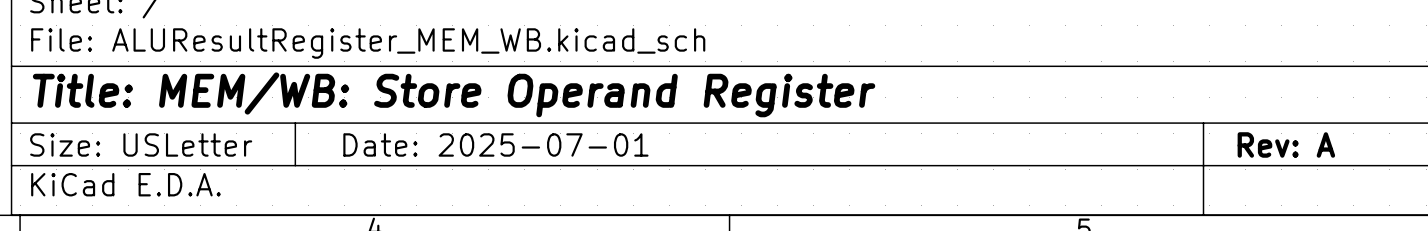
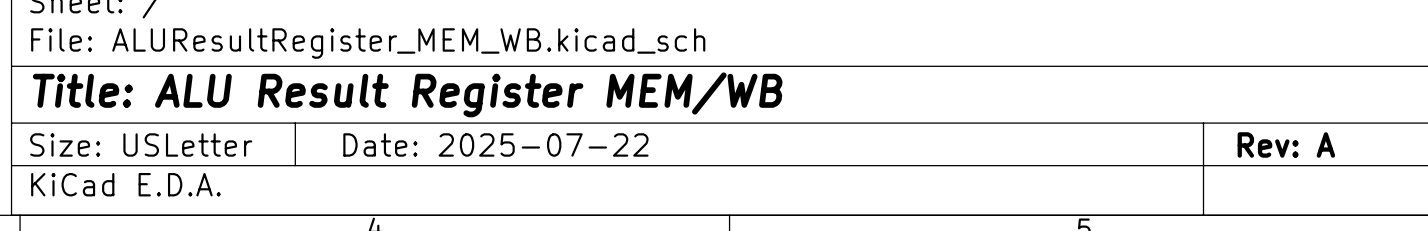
title block: Title: MEM/WB: Store Operand Register (454, 94) -> Title: ALU Result Register MEM/WB (407, 94)
title block: Date: 2025-07-01 (495, 144) -> Date: 2025-07-22 (495, 144)

